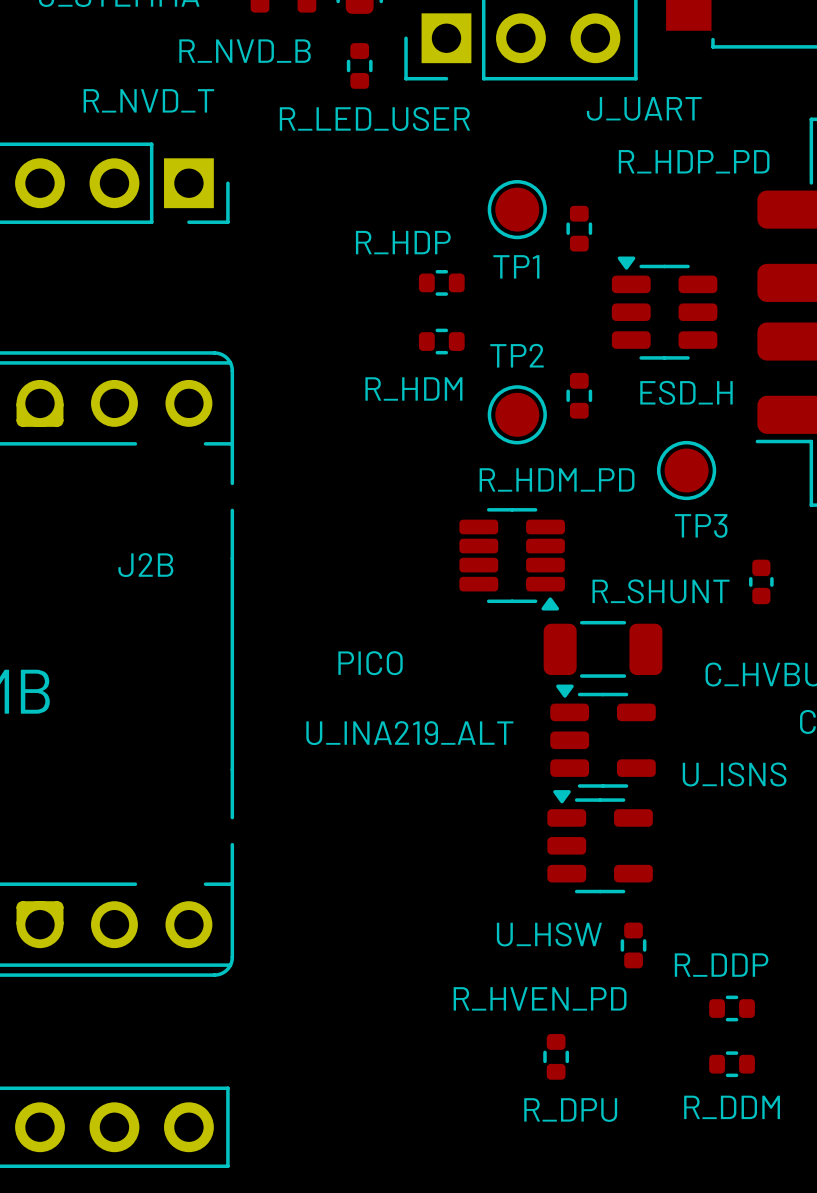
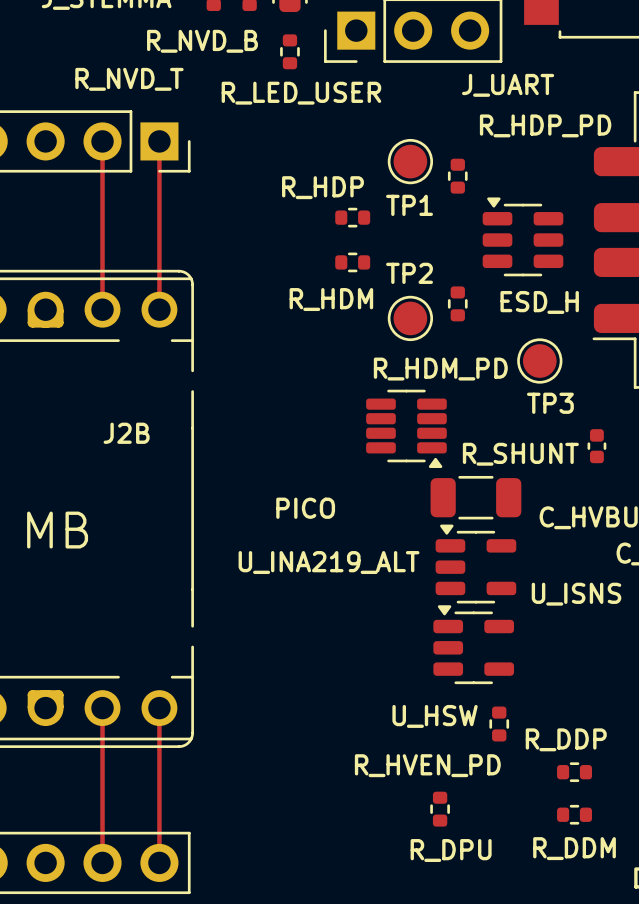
track: none -> (102, 141) (102, 309)
track: none -> (159, 141) (159, 309)
track: none -> (102, 708) (102, 862)
track: none -> (159, 708) (159, 862)

